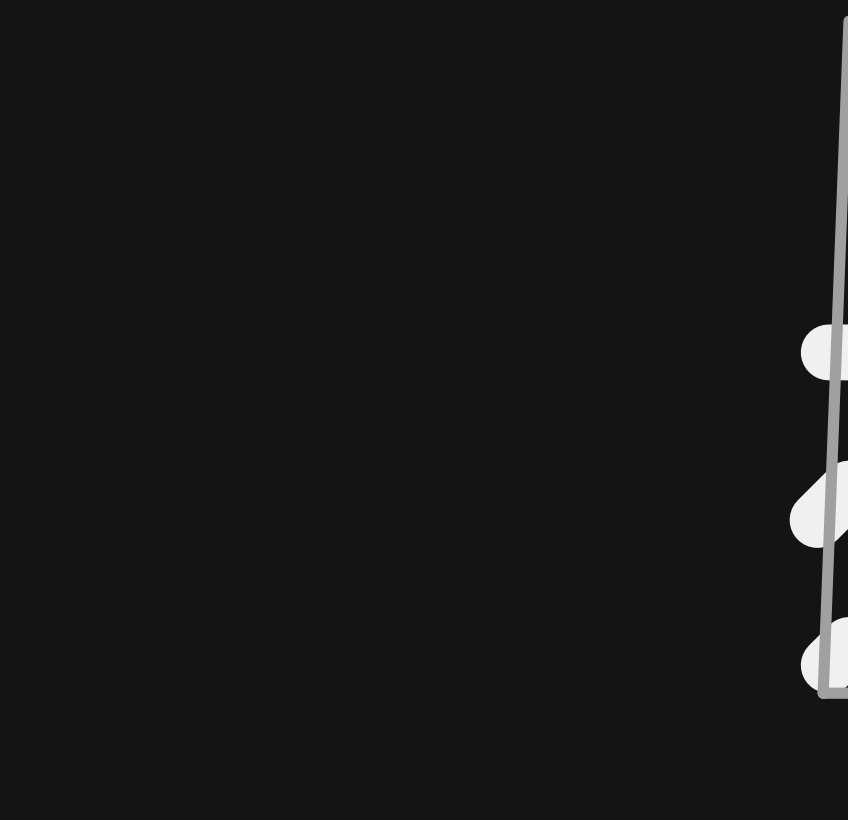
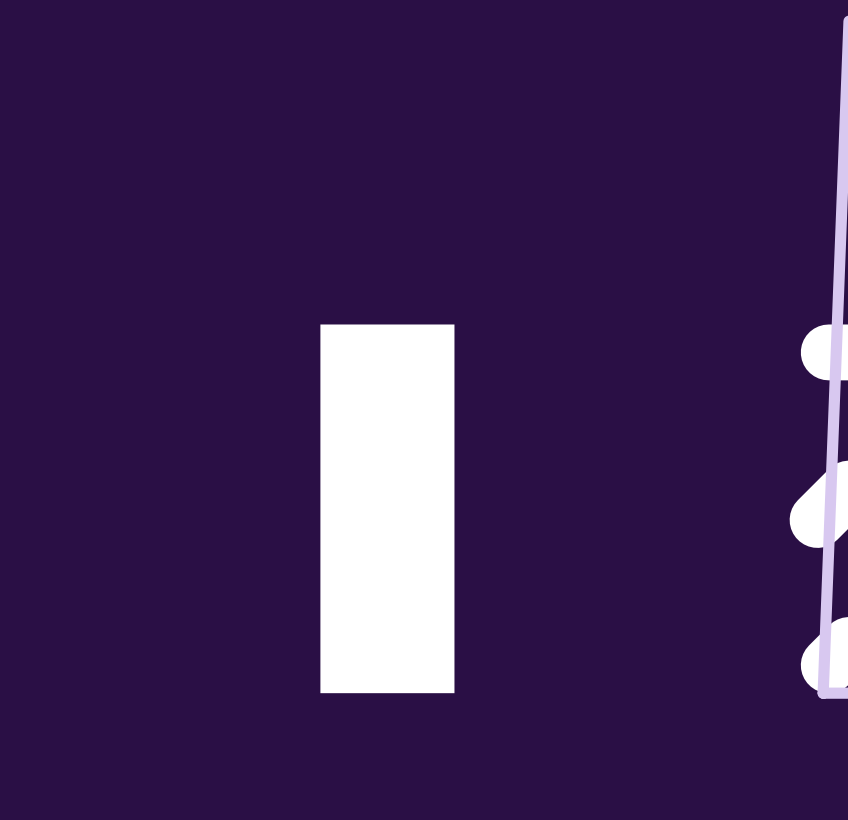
drawing: none -> [320, 324, 455, 694]

